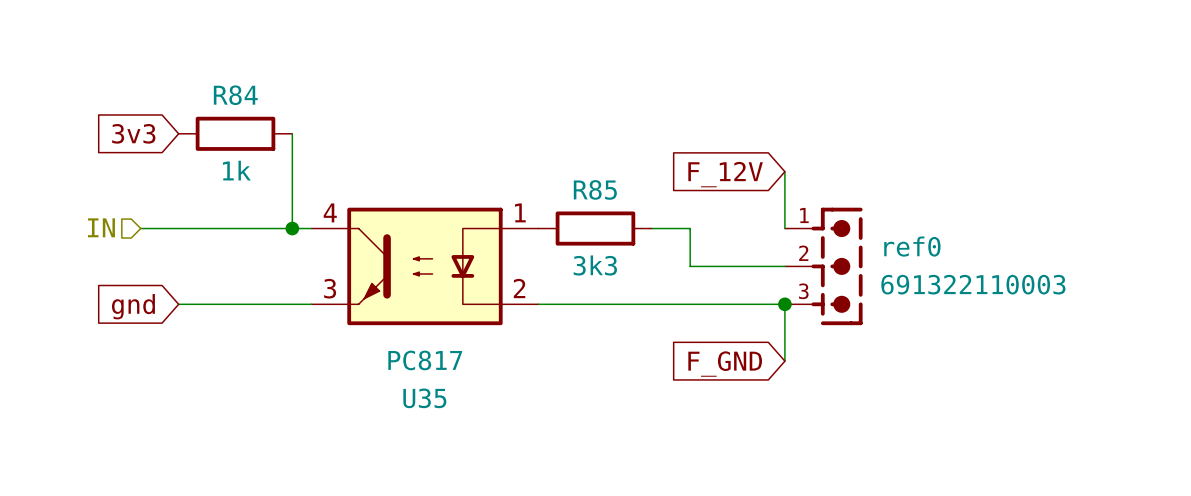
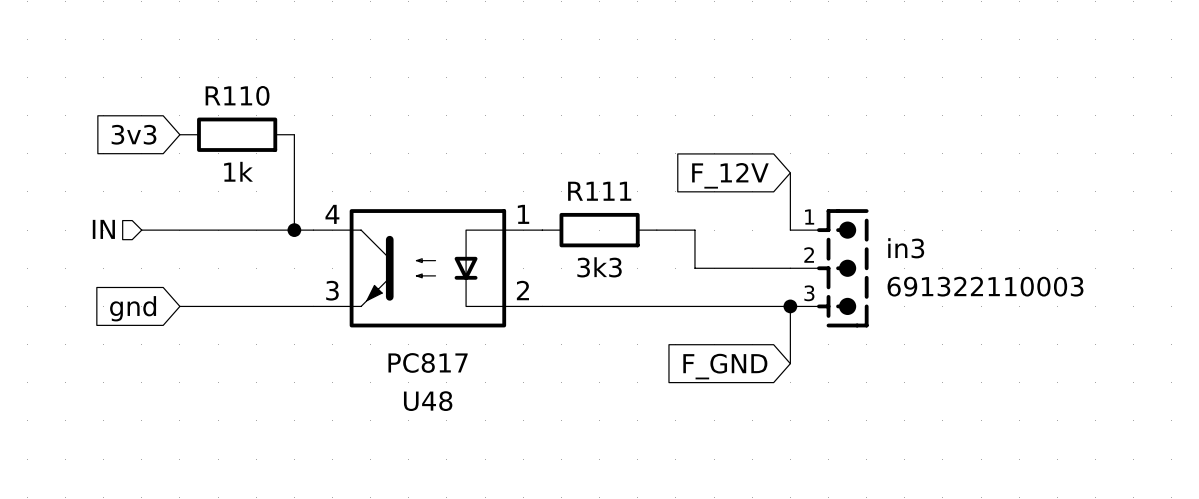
R84 name: R84 (235, 95) -> R110 (237, 95)
R85 name: R85 (595, 189) -> R111 (599, 191)
ref0 name: ref0 (912, 246) -> in3 (906, 248)
U35 name: U35 (424, 398) -> U48 (428, 401)

